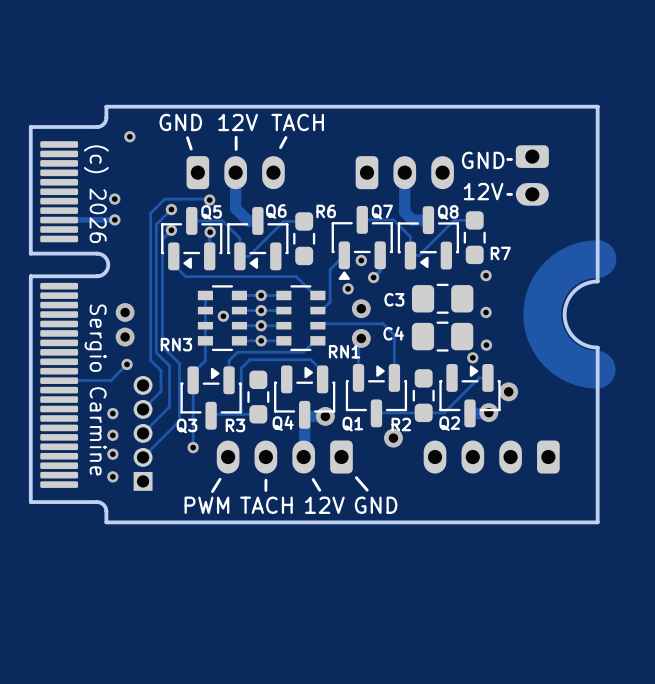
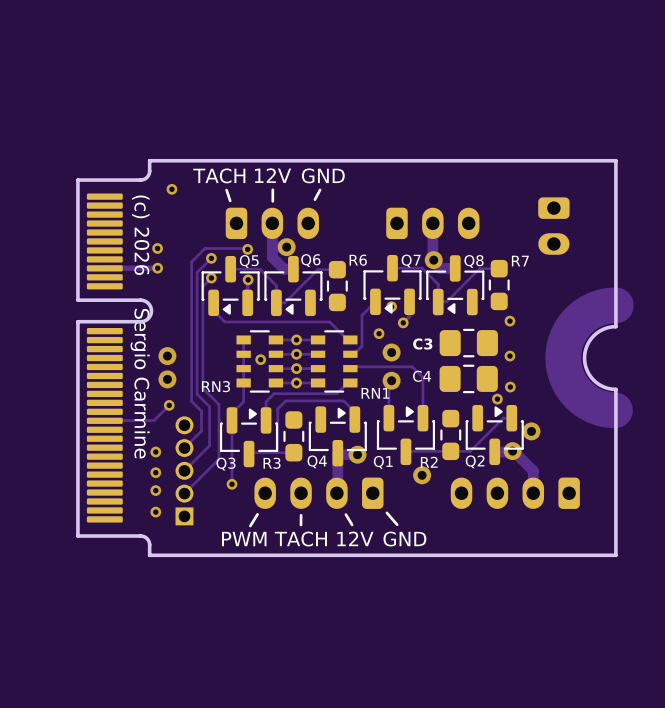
text: GND (180, 122) -> TACH (219, 175)
text: TACH (297, 122) -> GND (323, 175)
line: (511, 159) (507, 159) -> none
text: GND (483, 160) -> none
text: 12V (483, 191) -> none
line: (511, 194) (507, 194) -> none
via: none -> (286, 247)
Q7 footprint: [331, 205, 393, 280] -> [363, 254, 422, 316]
via: none -> (433, 260)
R7 name position: R7 (500, 253) -> R7 (520, 261)
track: none -> (513, 451) (533, 470) (533, 493)

